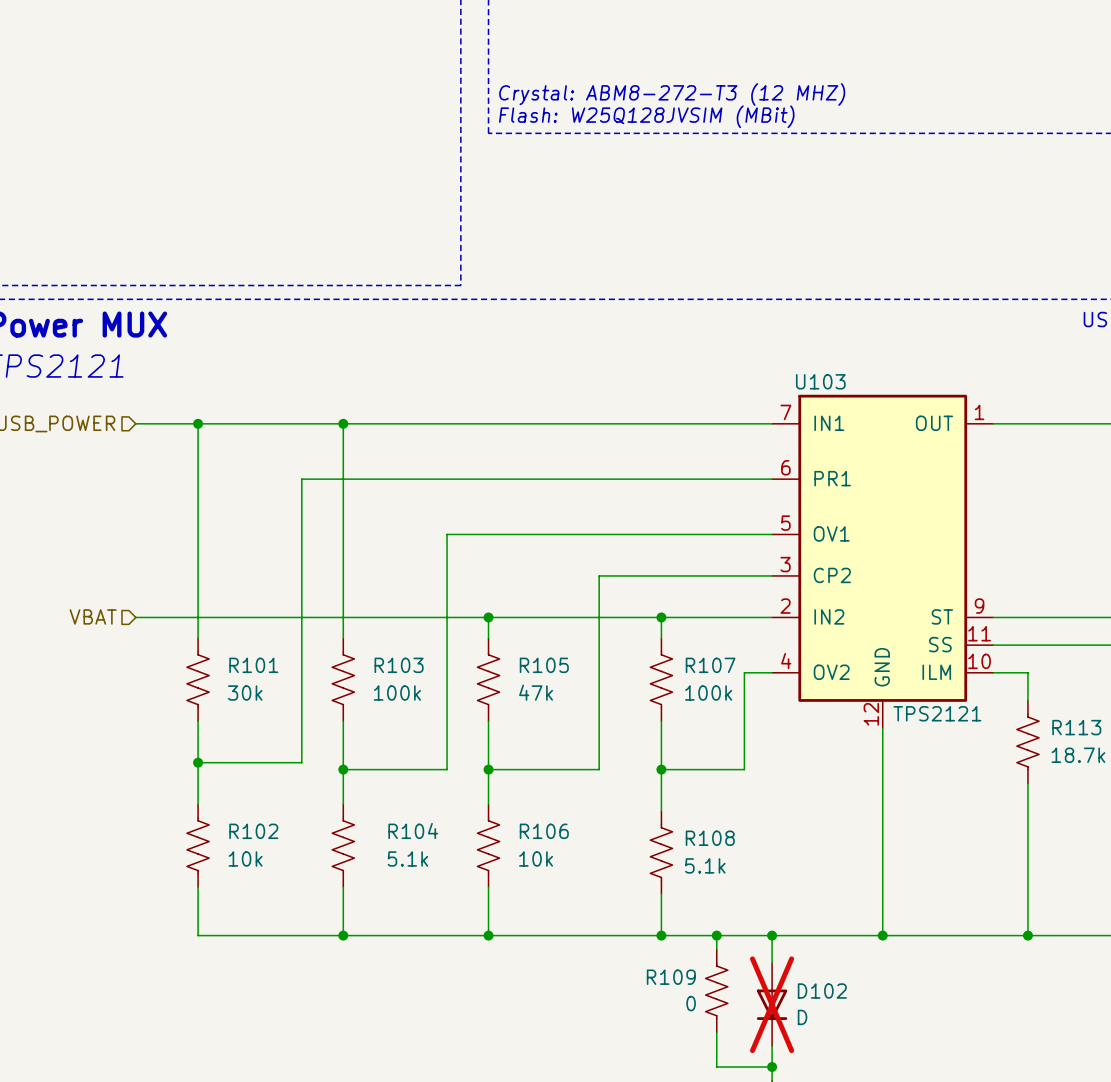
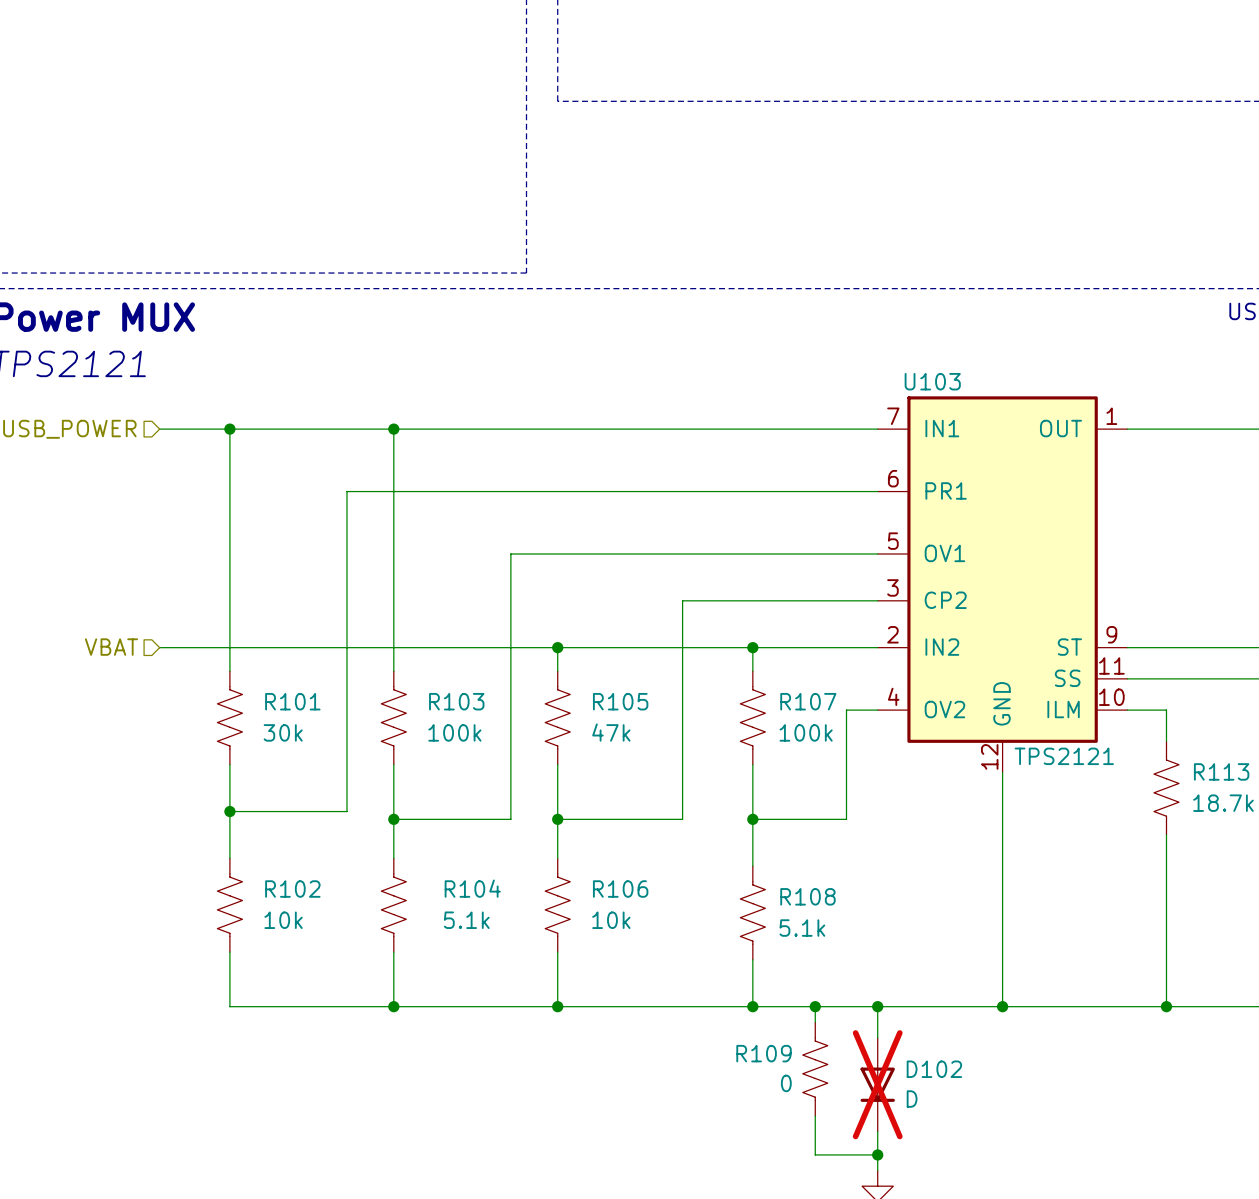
text: Crystal: ABM8-272-T3 (12 MHZ) (672, 94) -> none
text: Flash: W25Q128JVSIM (MBit) (646, 116) -> none

